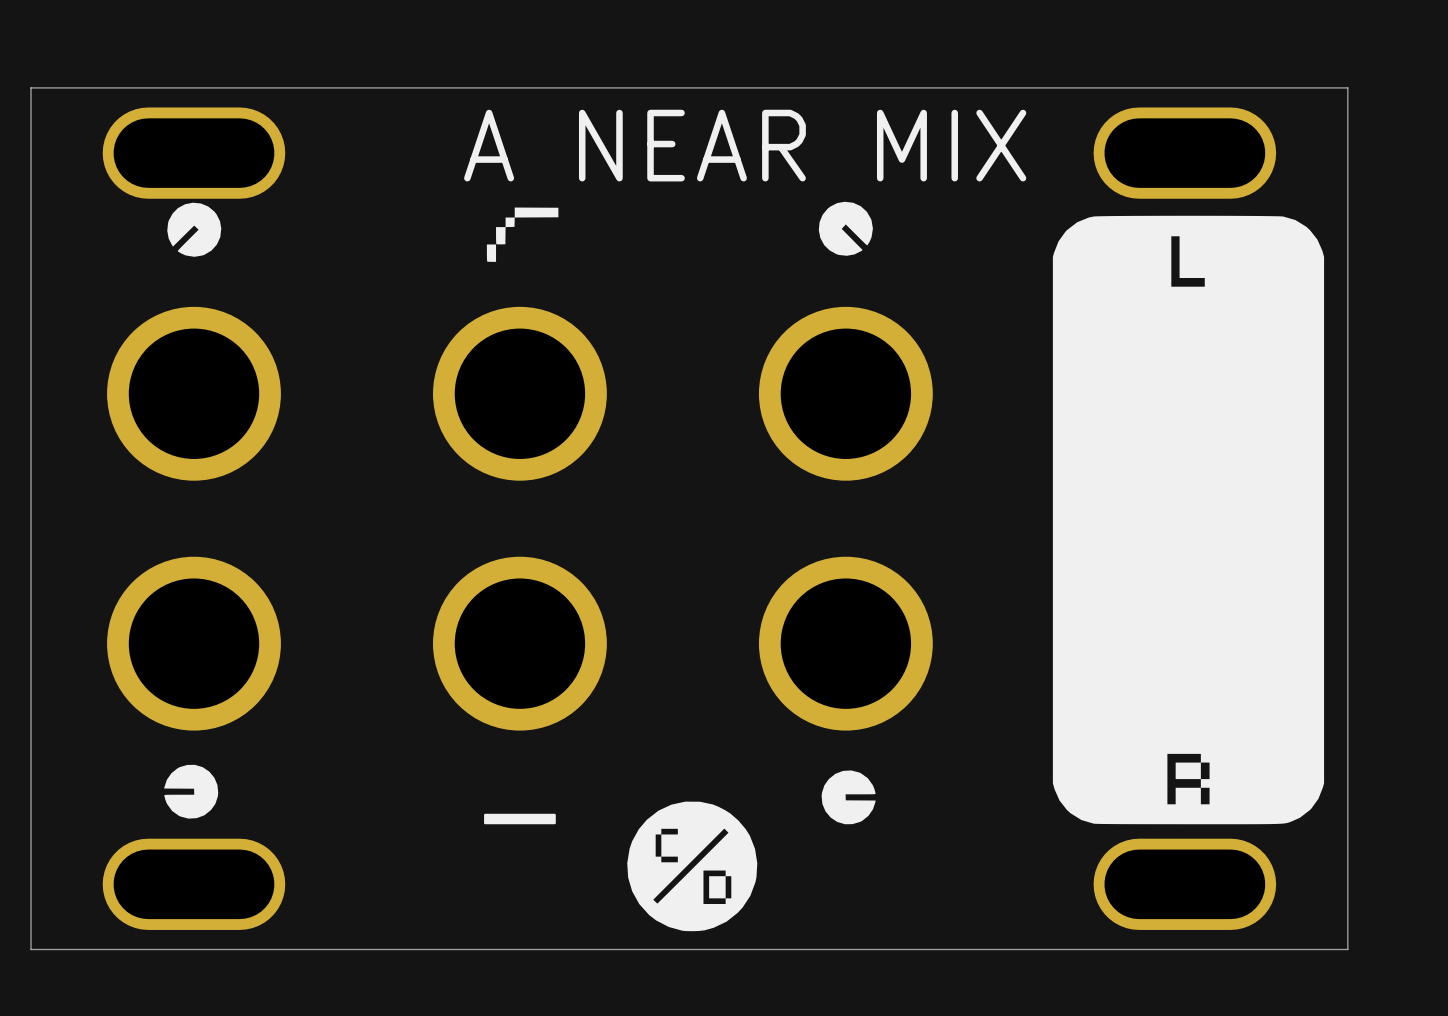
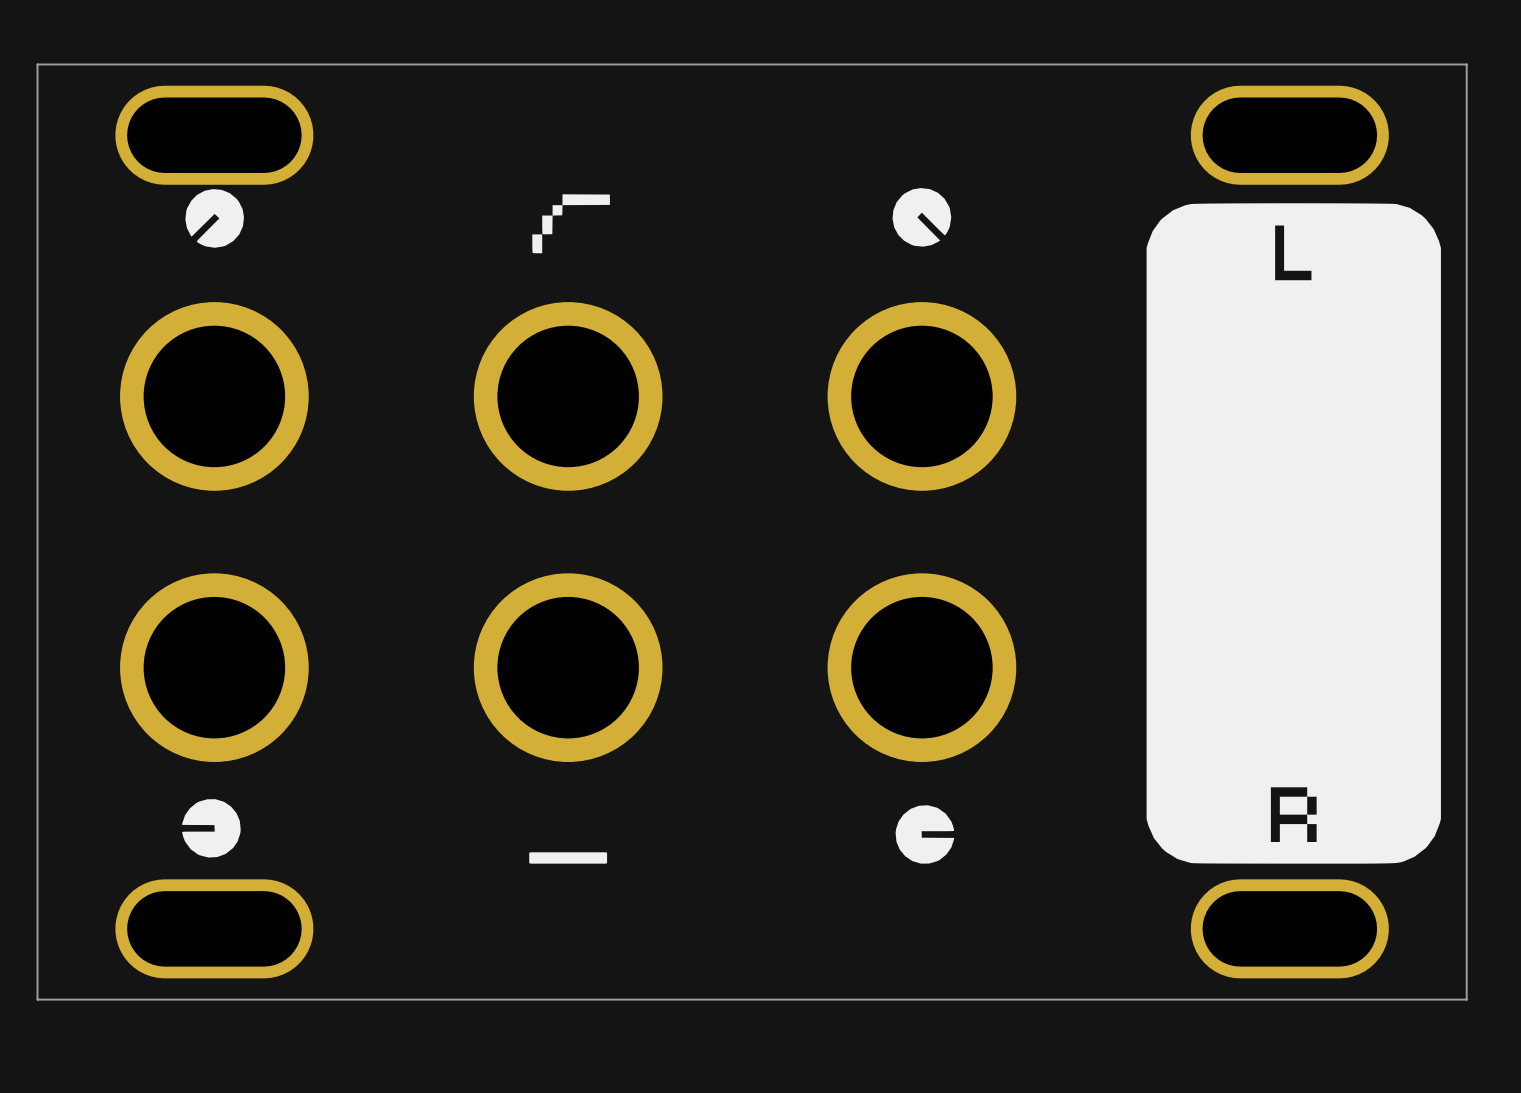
text: A NEAR MIX (745, 145) -> none
drawing: [627, 801, 758, 932] -> none

